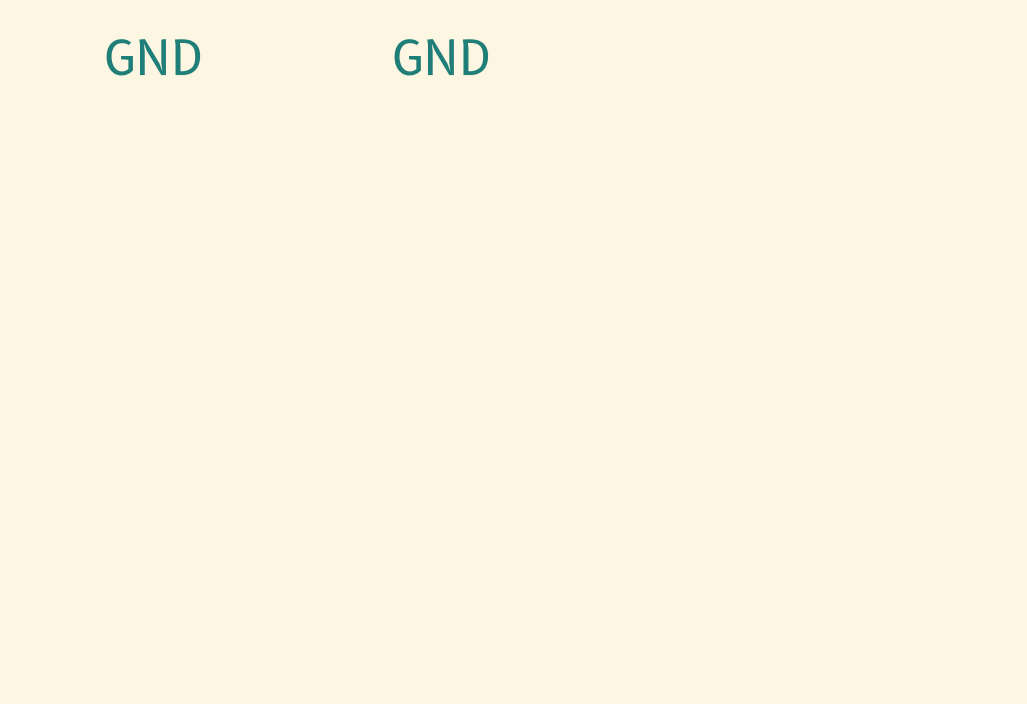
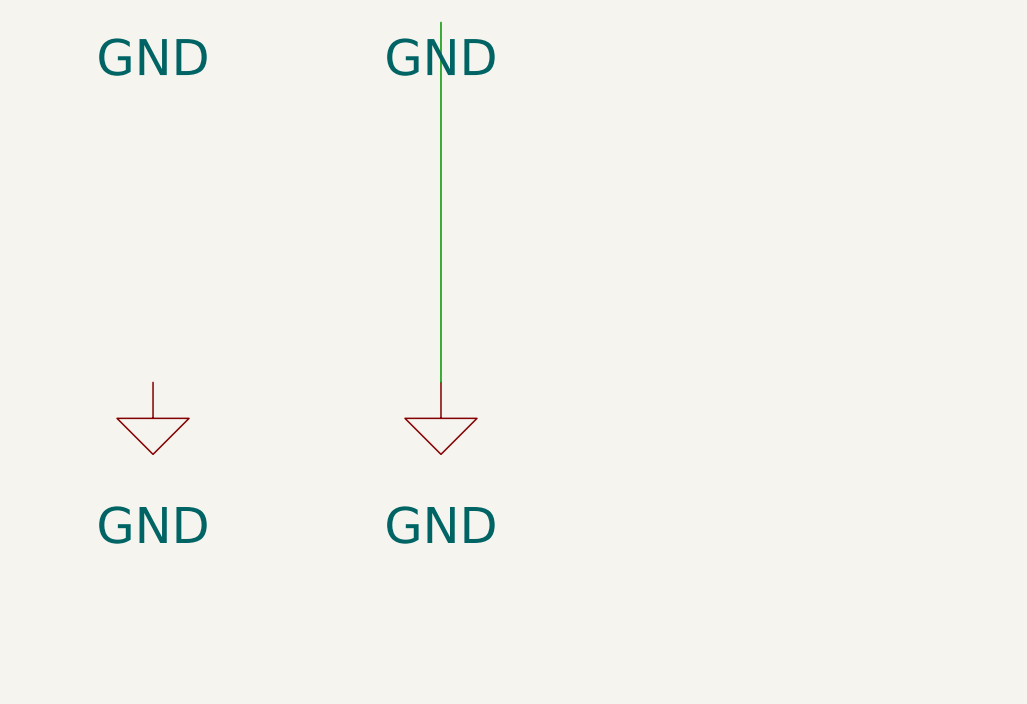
wire: none -> (440, 22) (440, 382)
power symbol: none -> GND (153, 418)
power symbol: none -> GND (440, 418)

